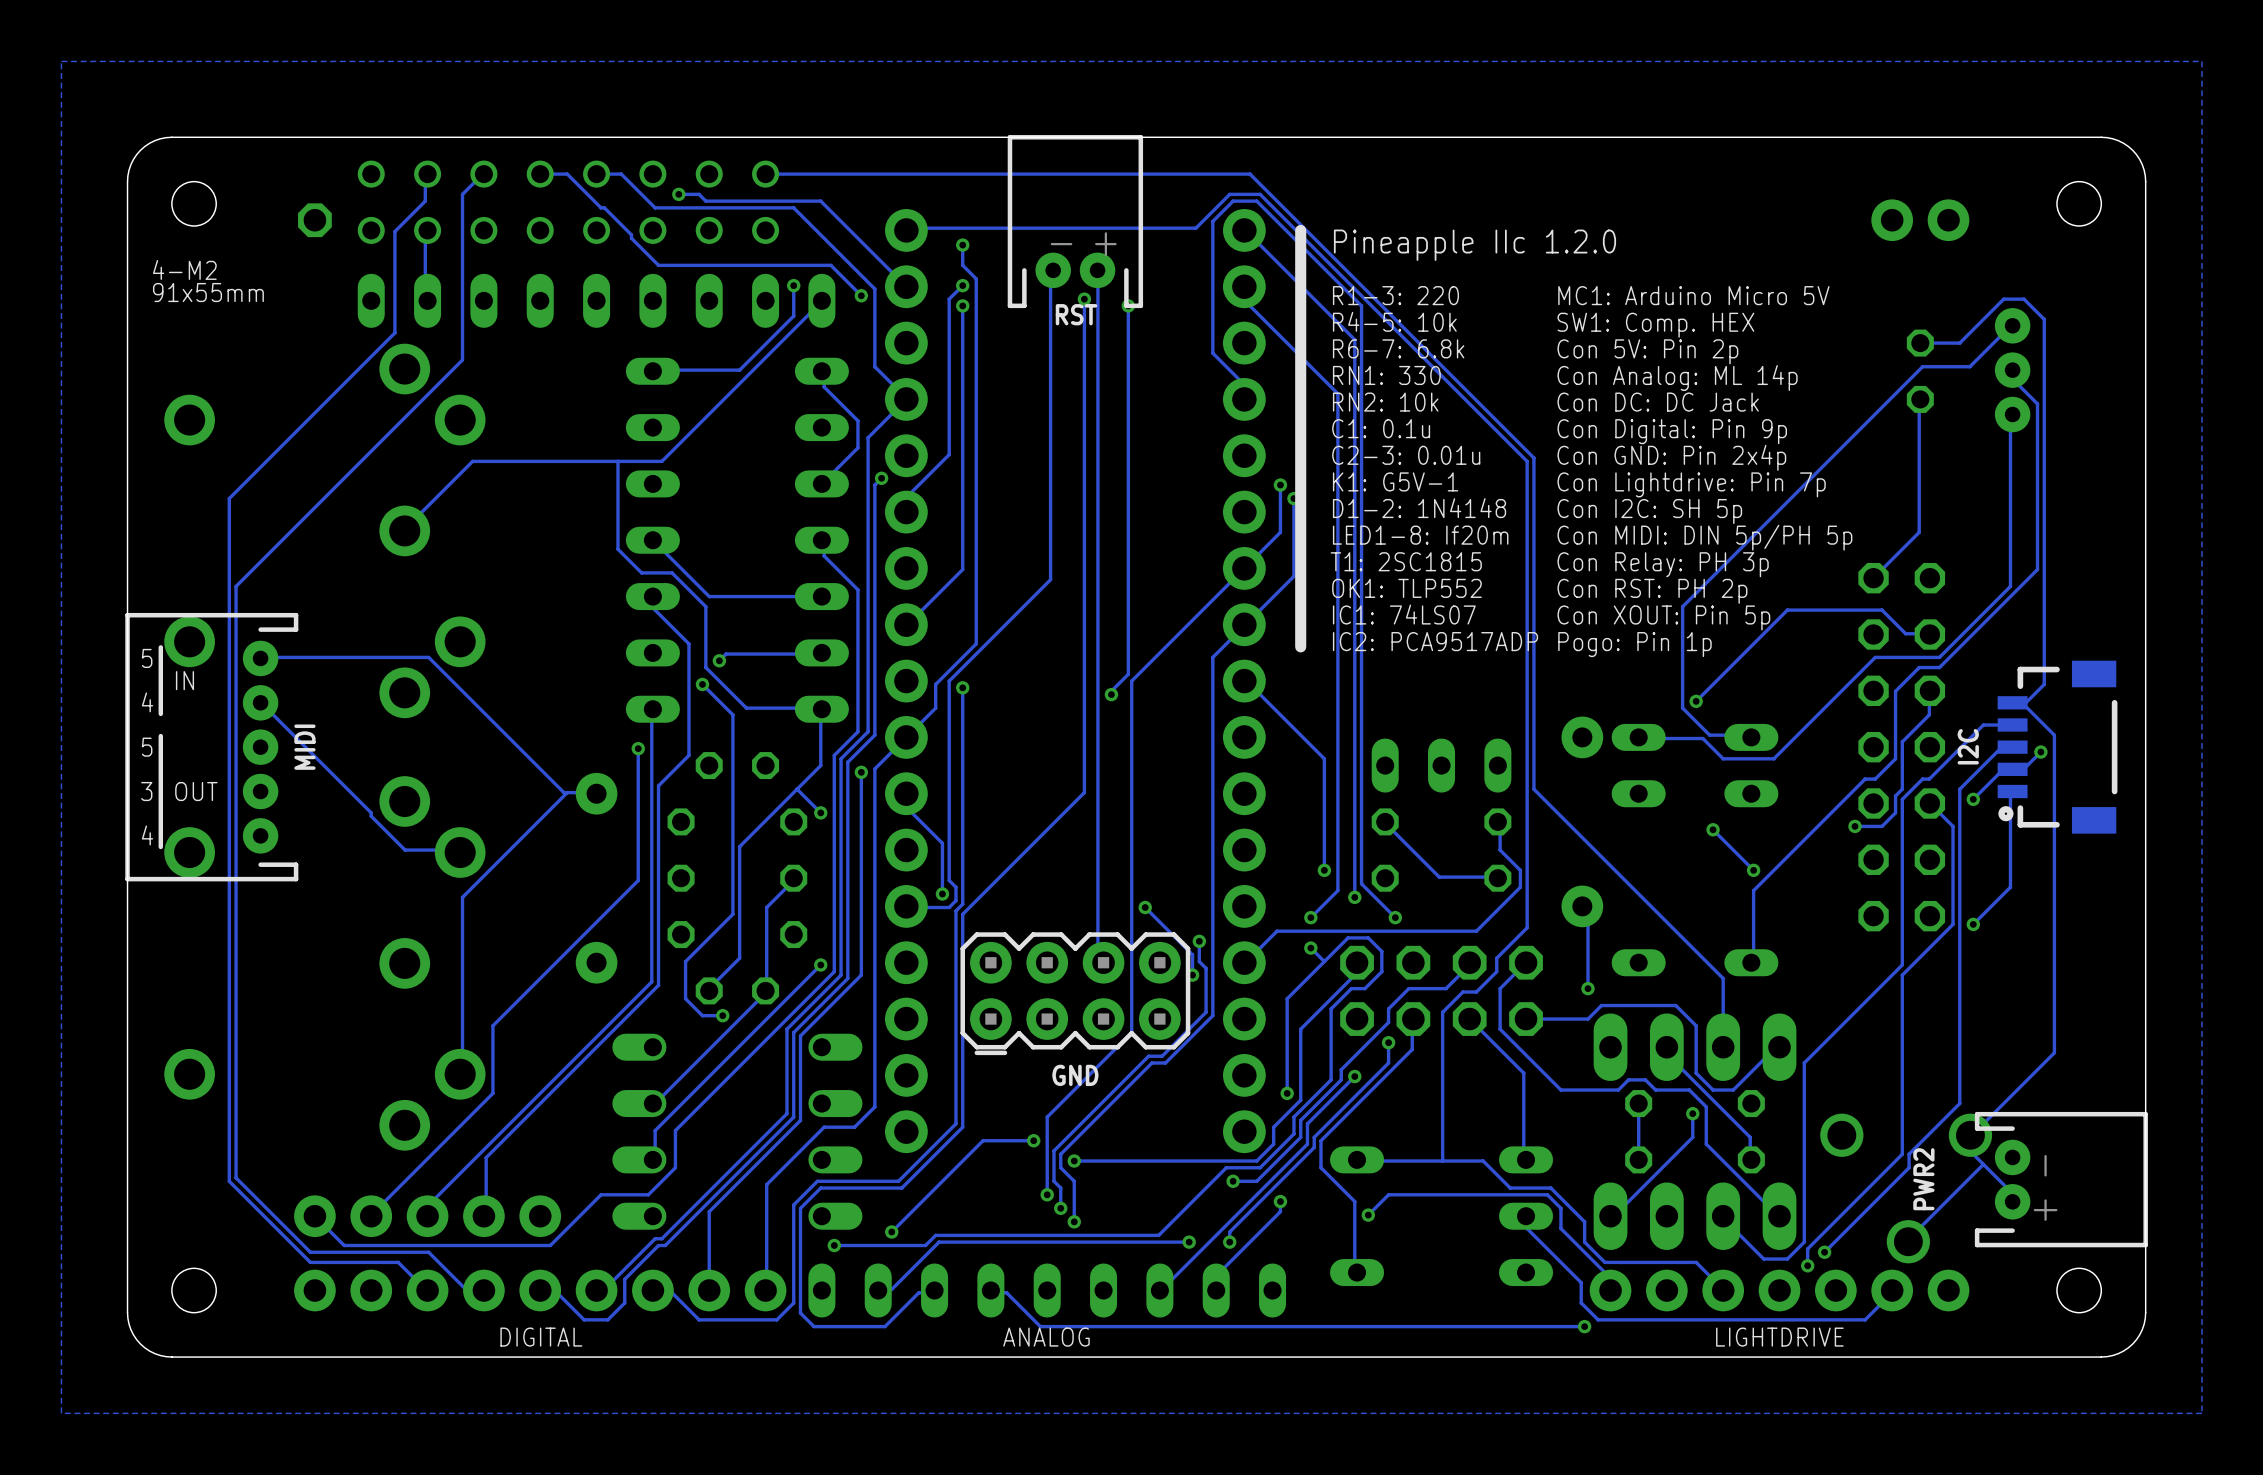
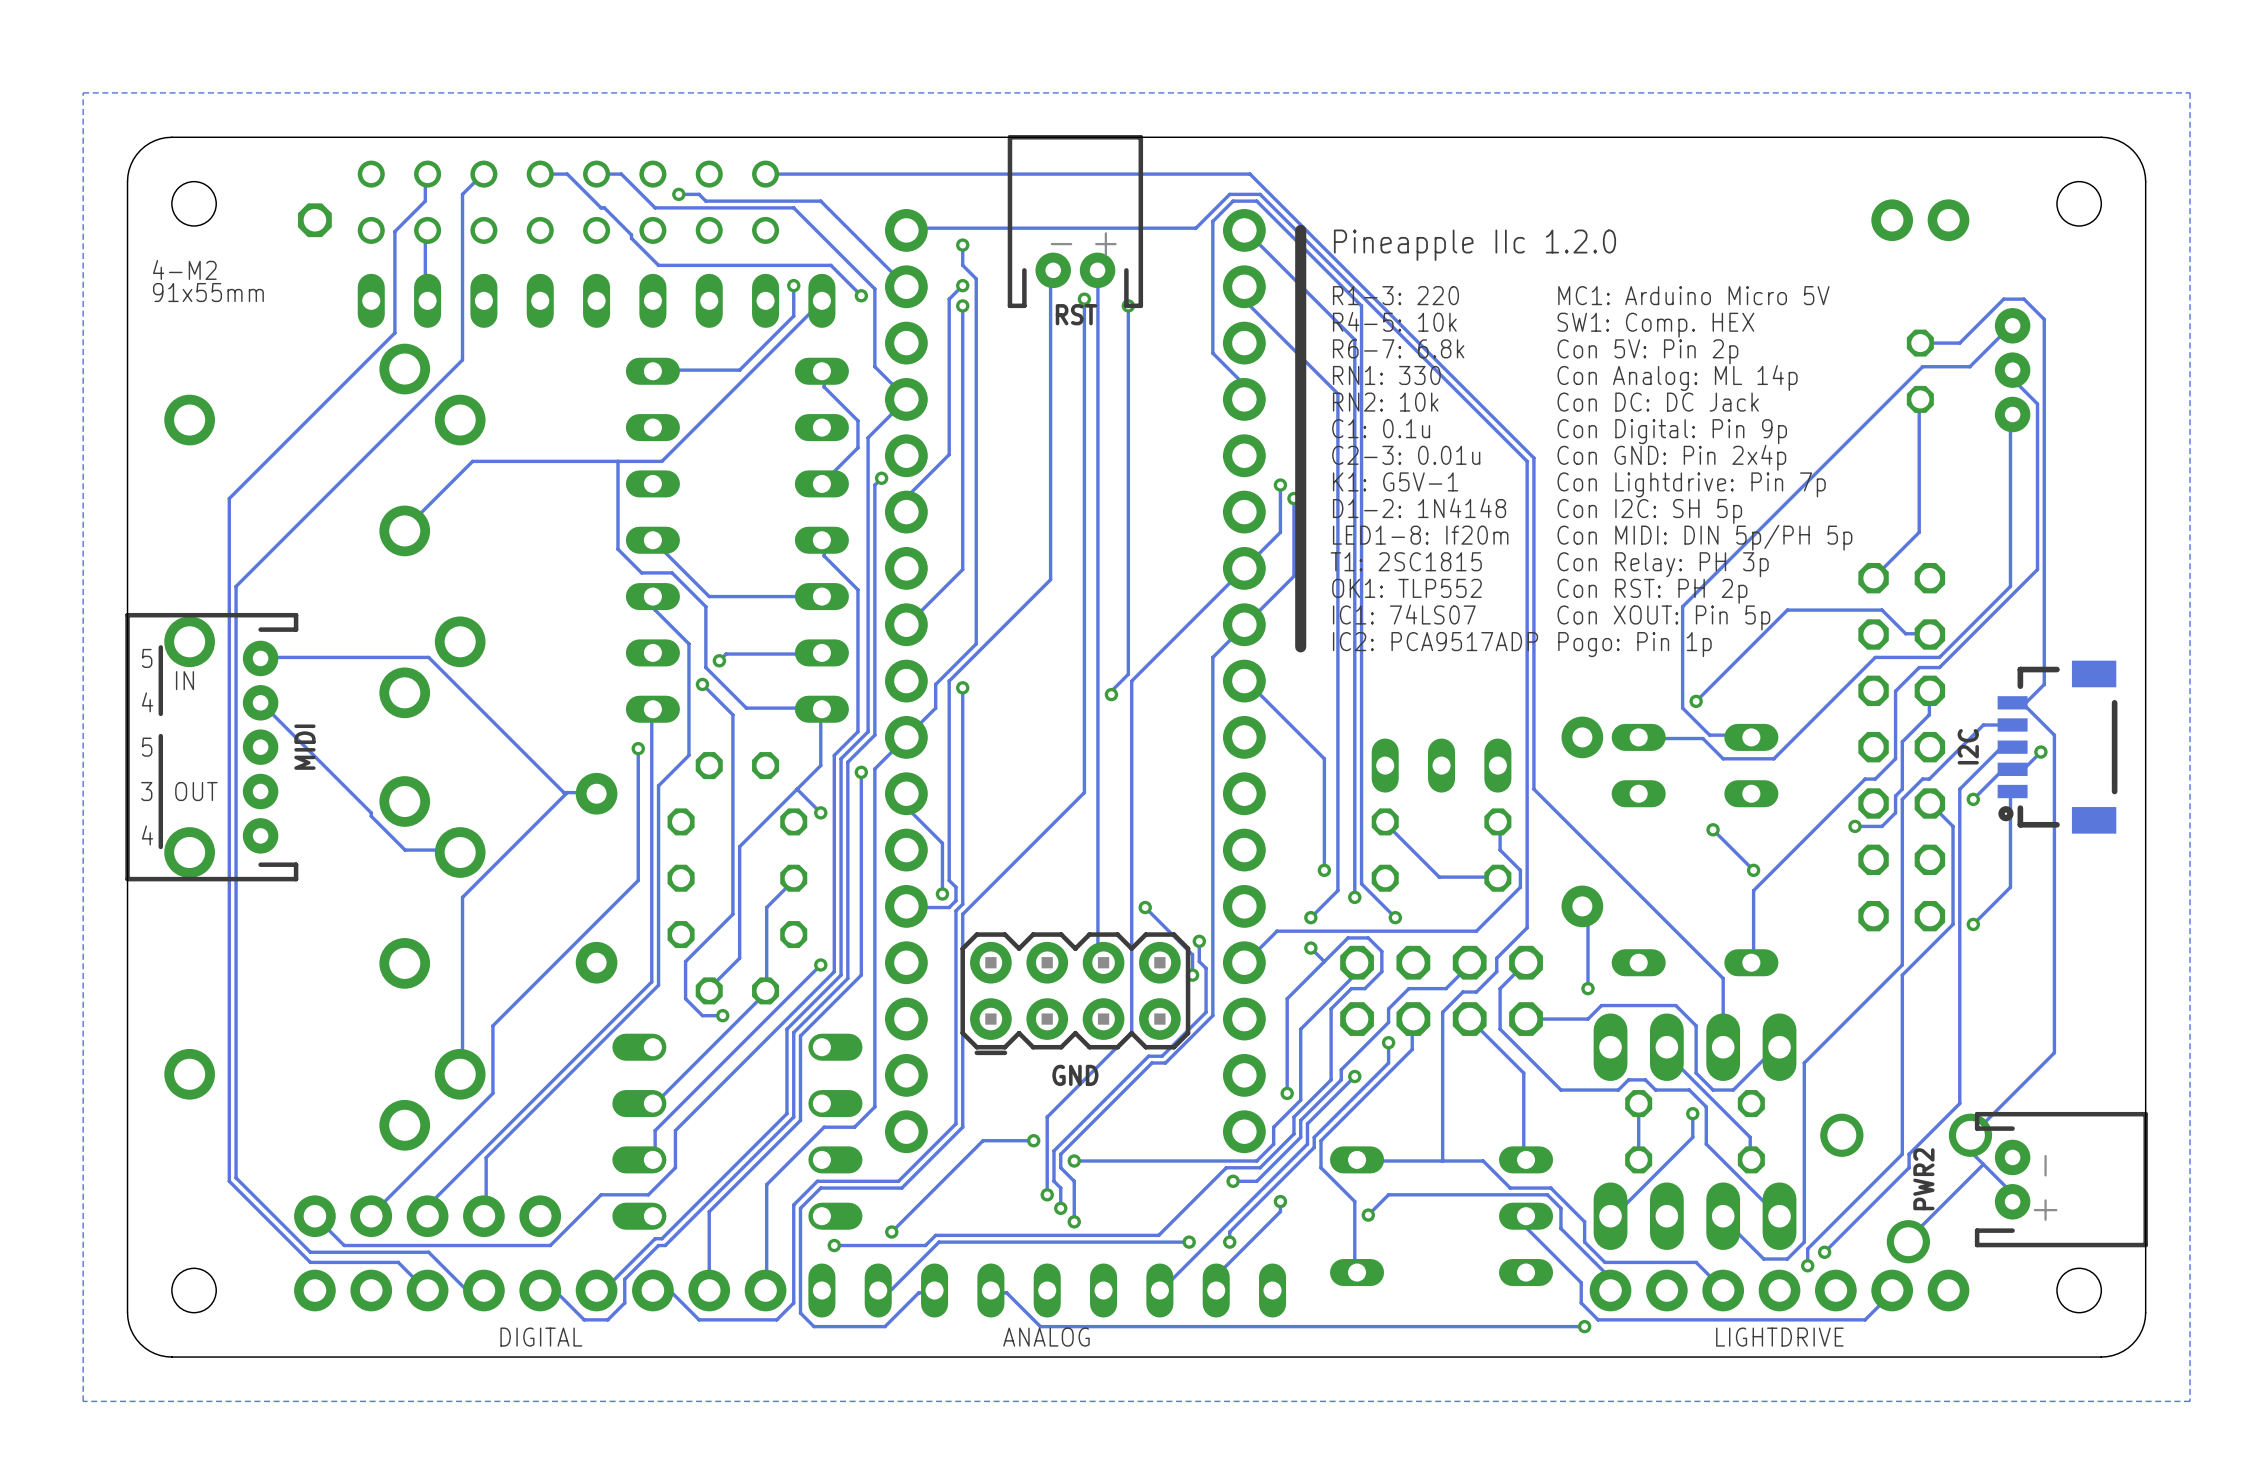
zone outline: (2202, 61) (61, 61) (61, 1413) (2202, 1413) (2202, 61) -> (2190, 92) (2190, 1401) (83, 1401) (83, 92) (2190, 92)

